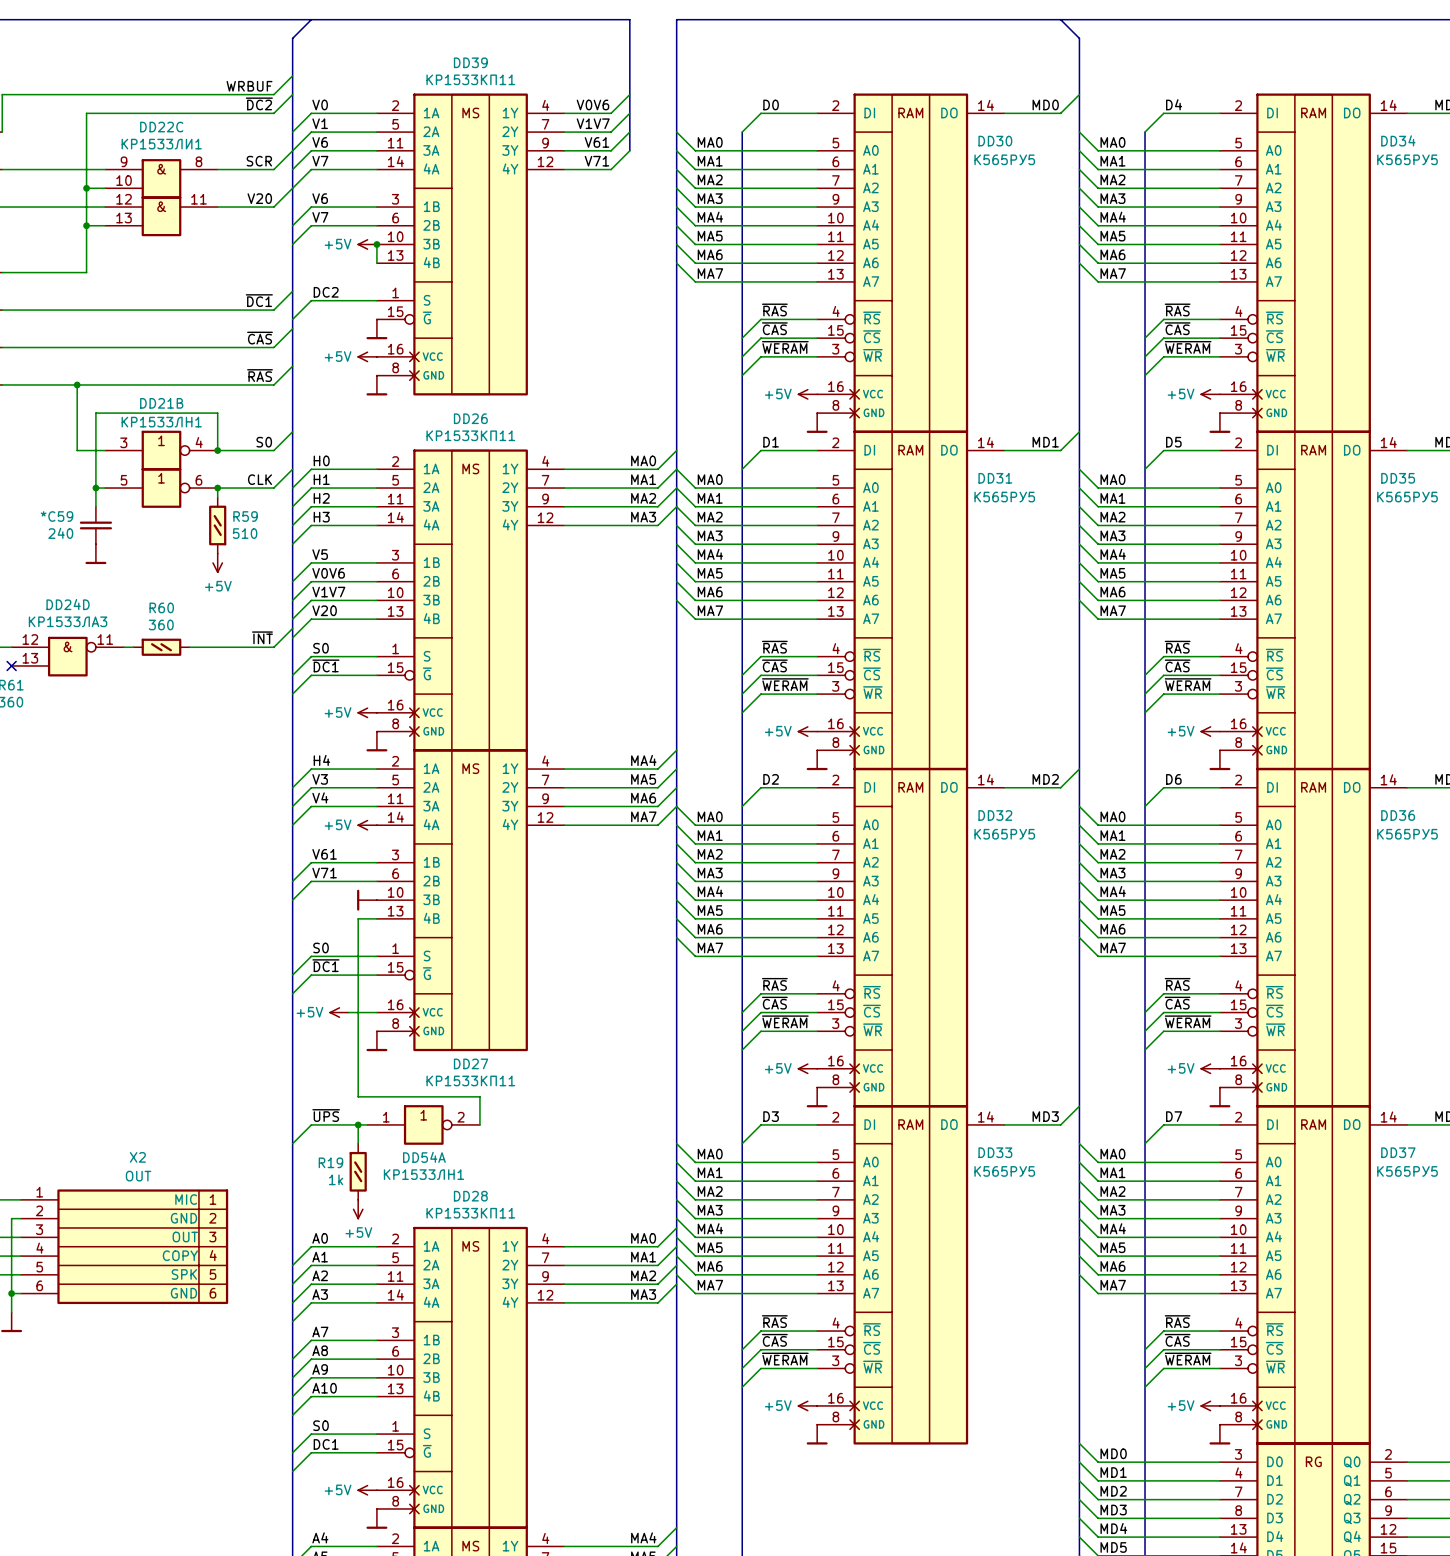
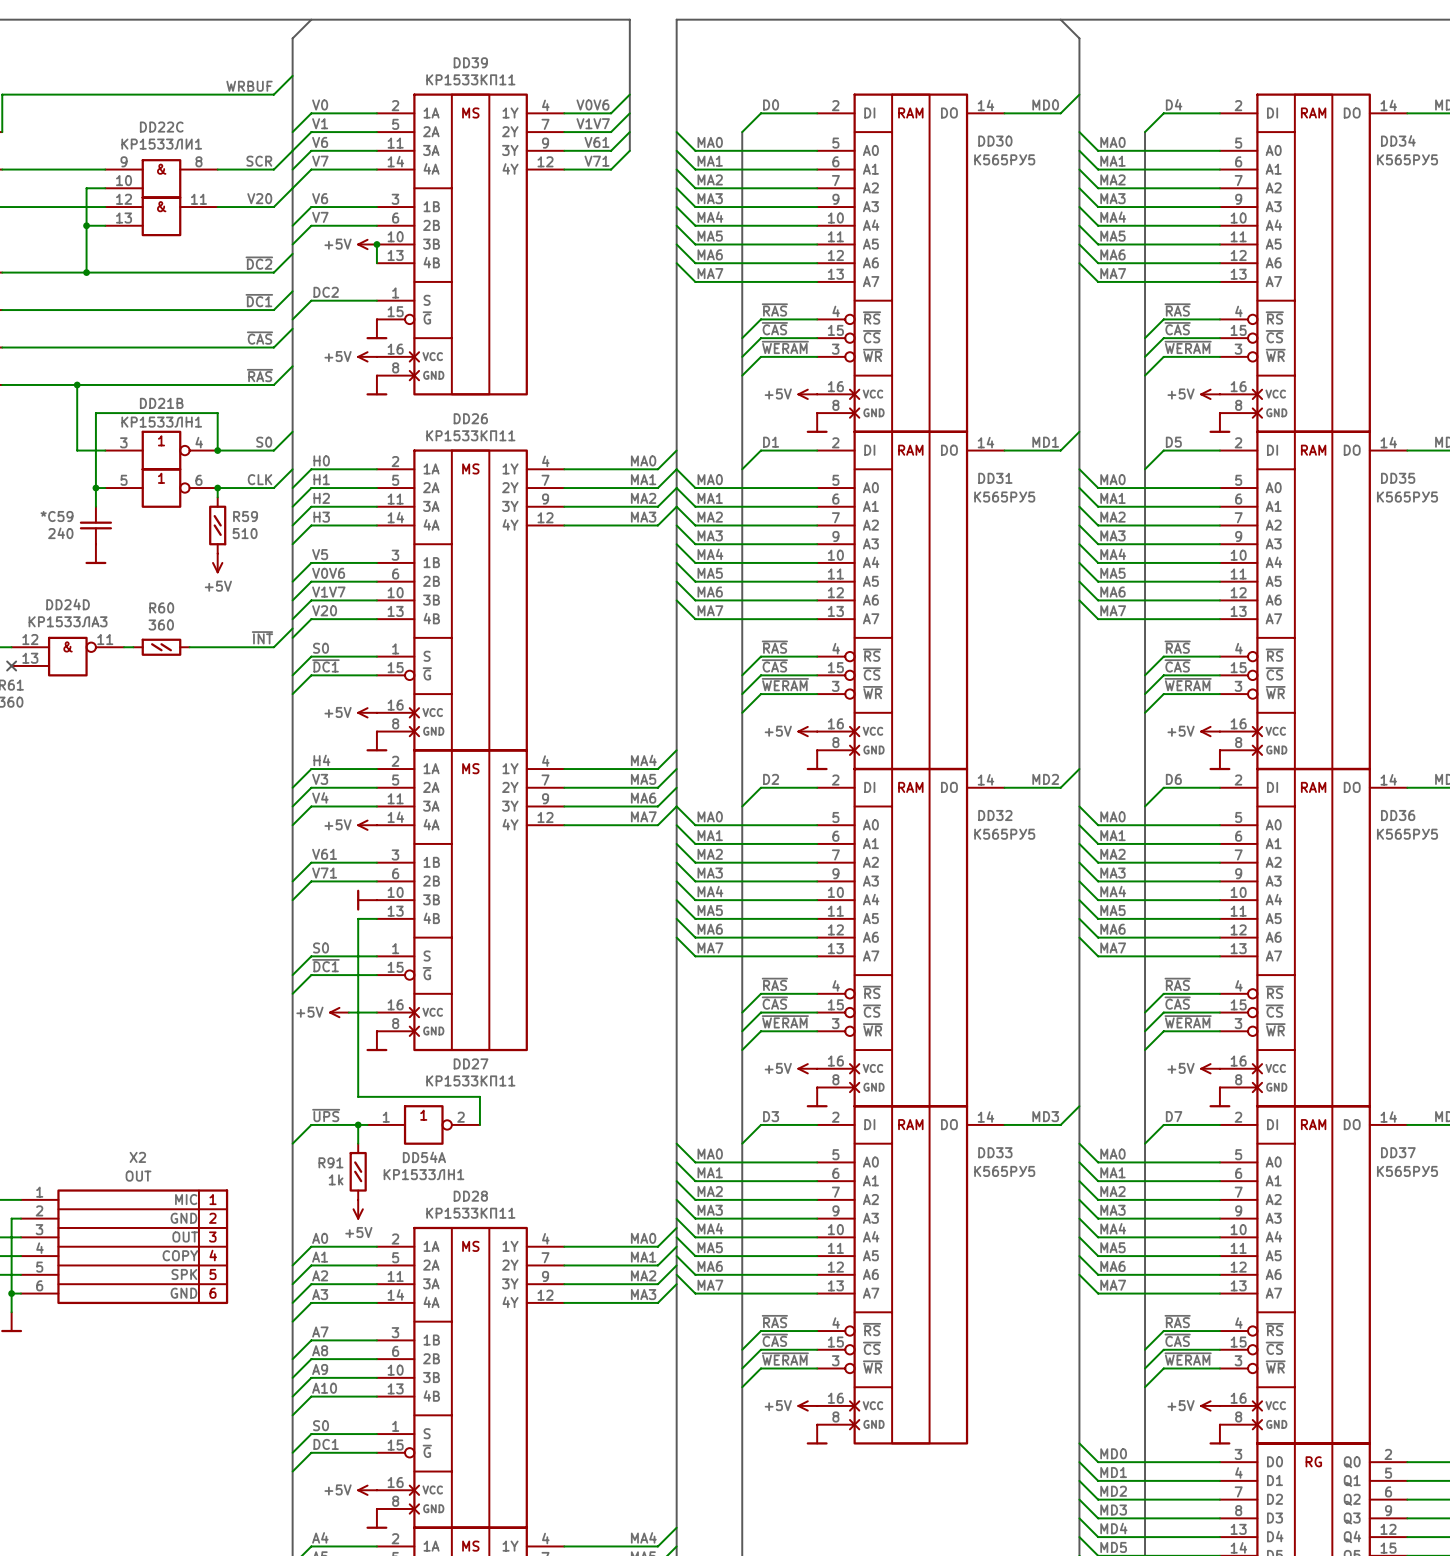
wire: (292, 94) (273, 113) (86, 113) (86, 188) -> none
label position: ~{DC2} (259, 103) -> ~{DC2} (259, 263)
junction: (86, 188) -> none
wire: none -> (292, 253) (273, 272) (86, 272)
junction: none -> (86, 272)
R19 name: R19 (330, 1162) -> R91 (330, 1162)

